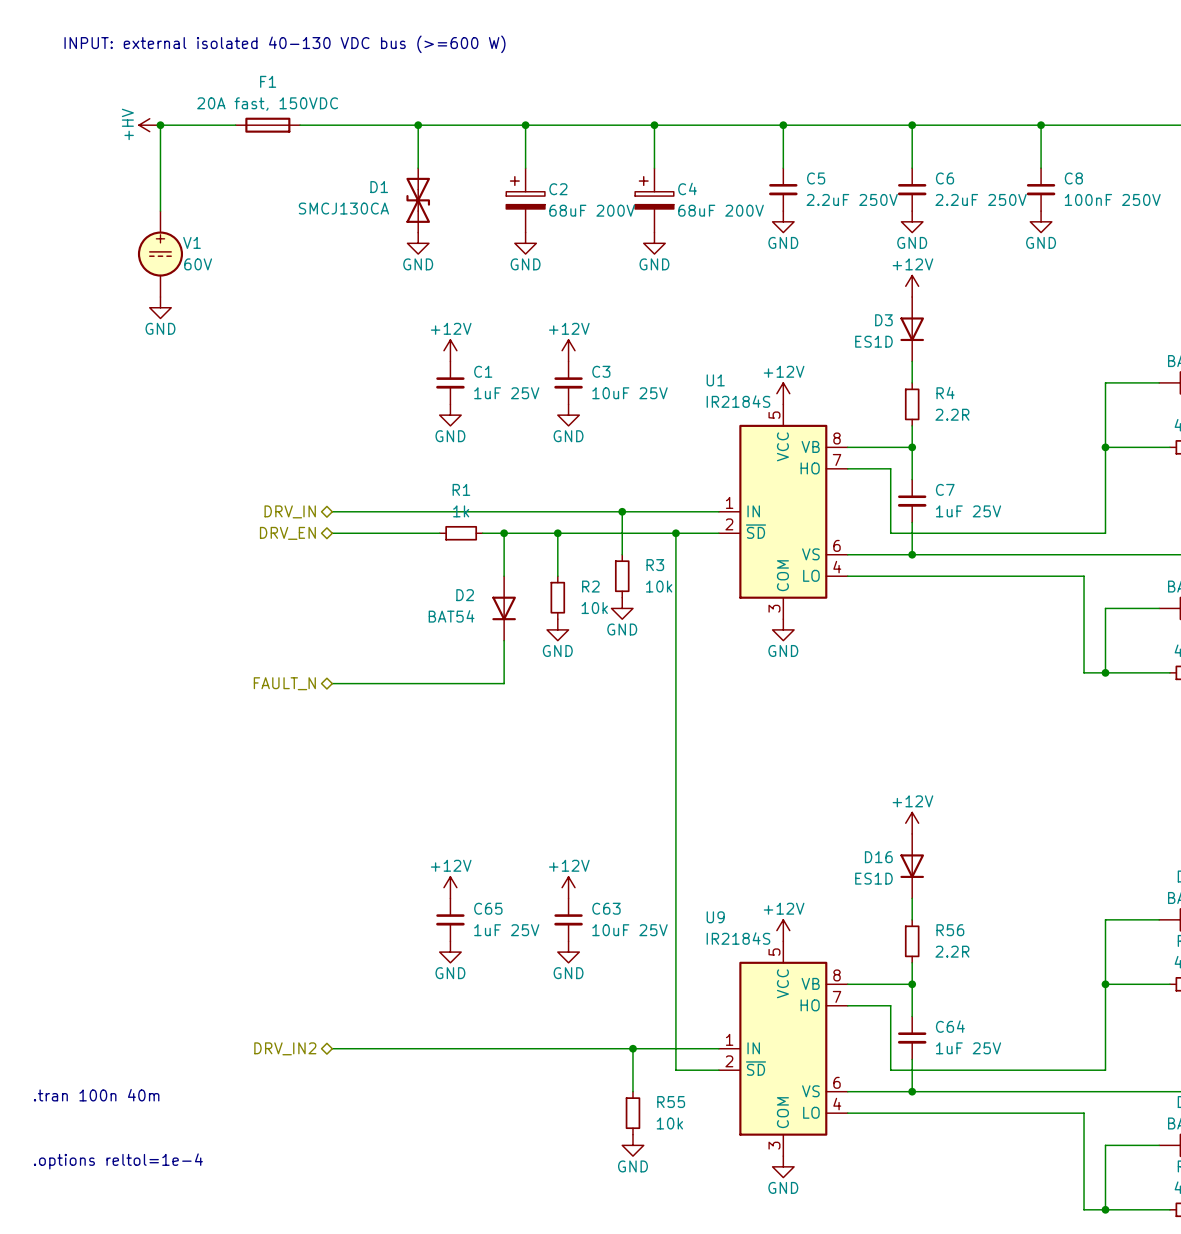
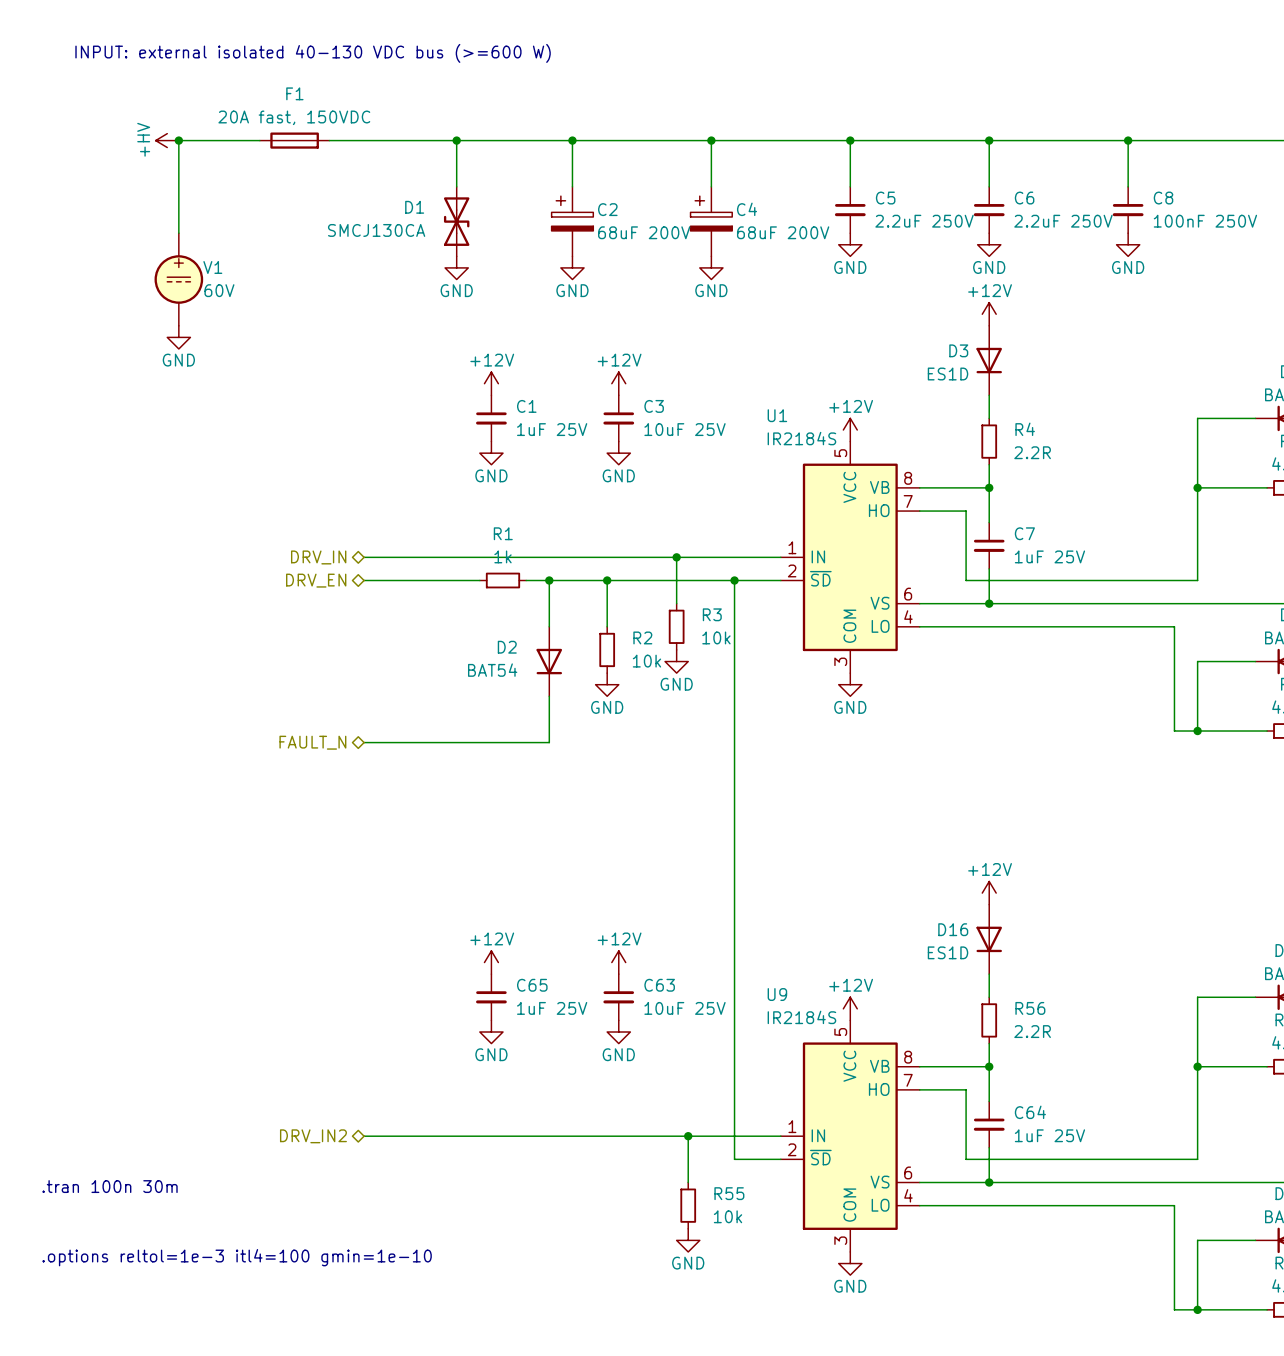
text: .tran 100n 40m (96, 1095) -> .tran 100n 30m (110, 1186)
text: .options reltol=1e-4 (118, 1161) -> .options reltol=1e-3 itl4=100 gmin=1e-10 (237, 1257)

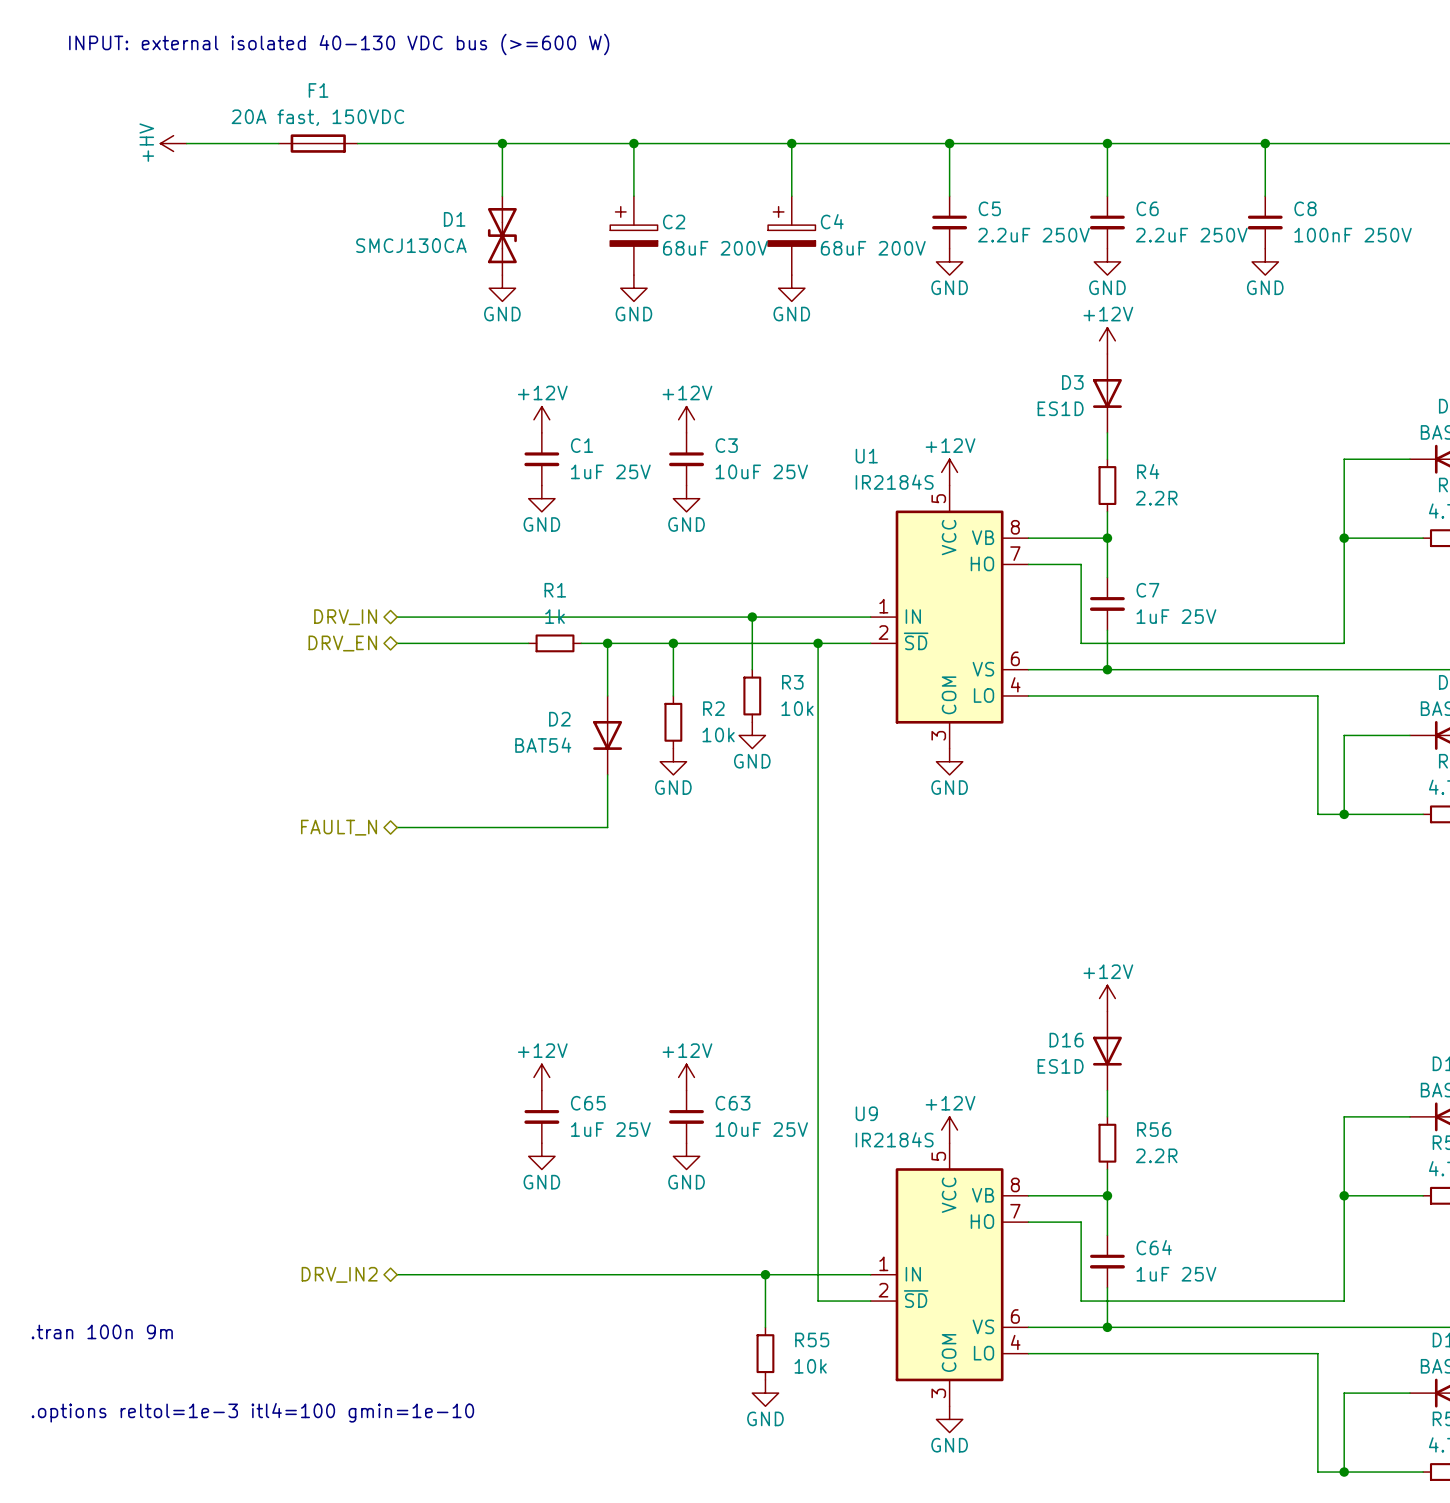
wire: (178, 140) (178, 233) -> none
junction: (178, 140) -> none
V1: 60V (178, 279) -> none
power symbol: GND (178, 337) -> none
text: .tran 100n 30m (110, 1186) -> .tran 100n 9m (102, 1331)

